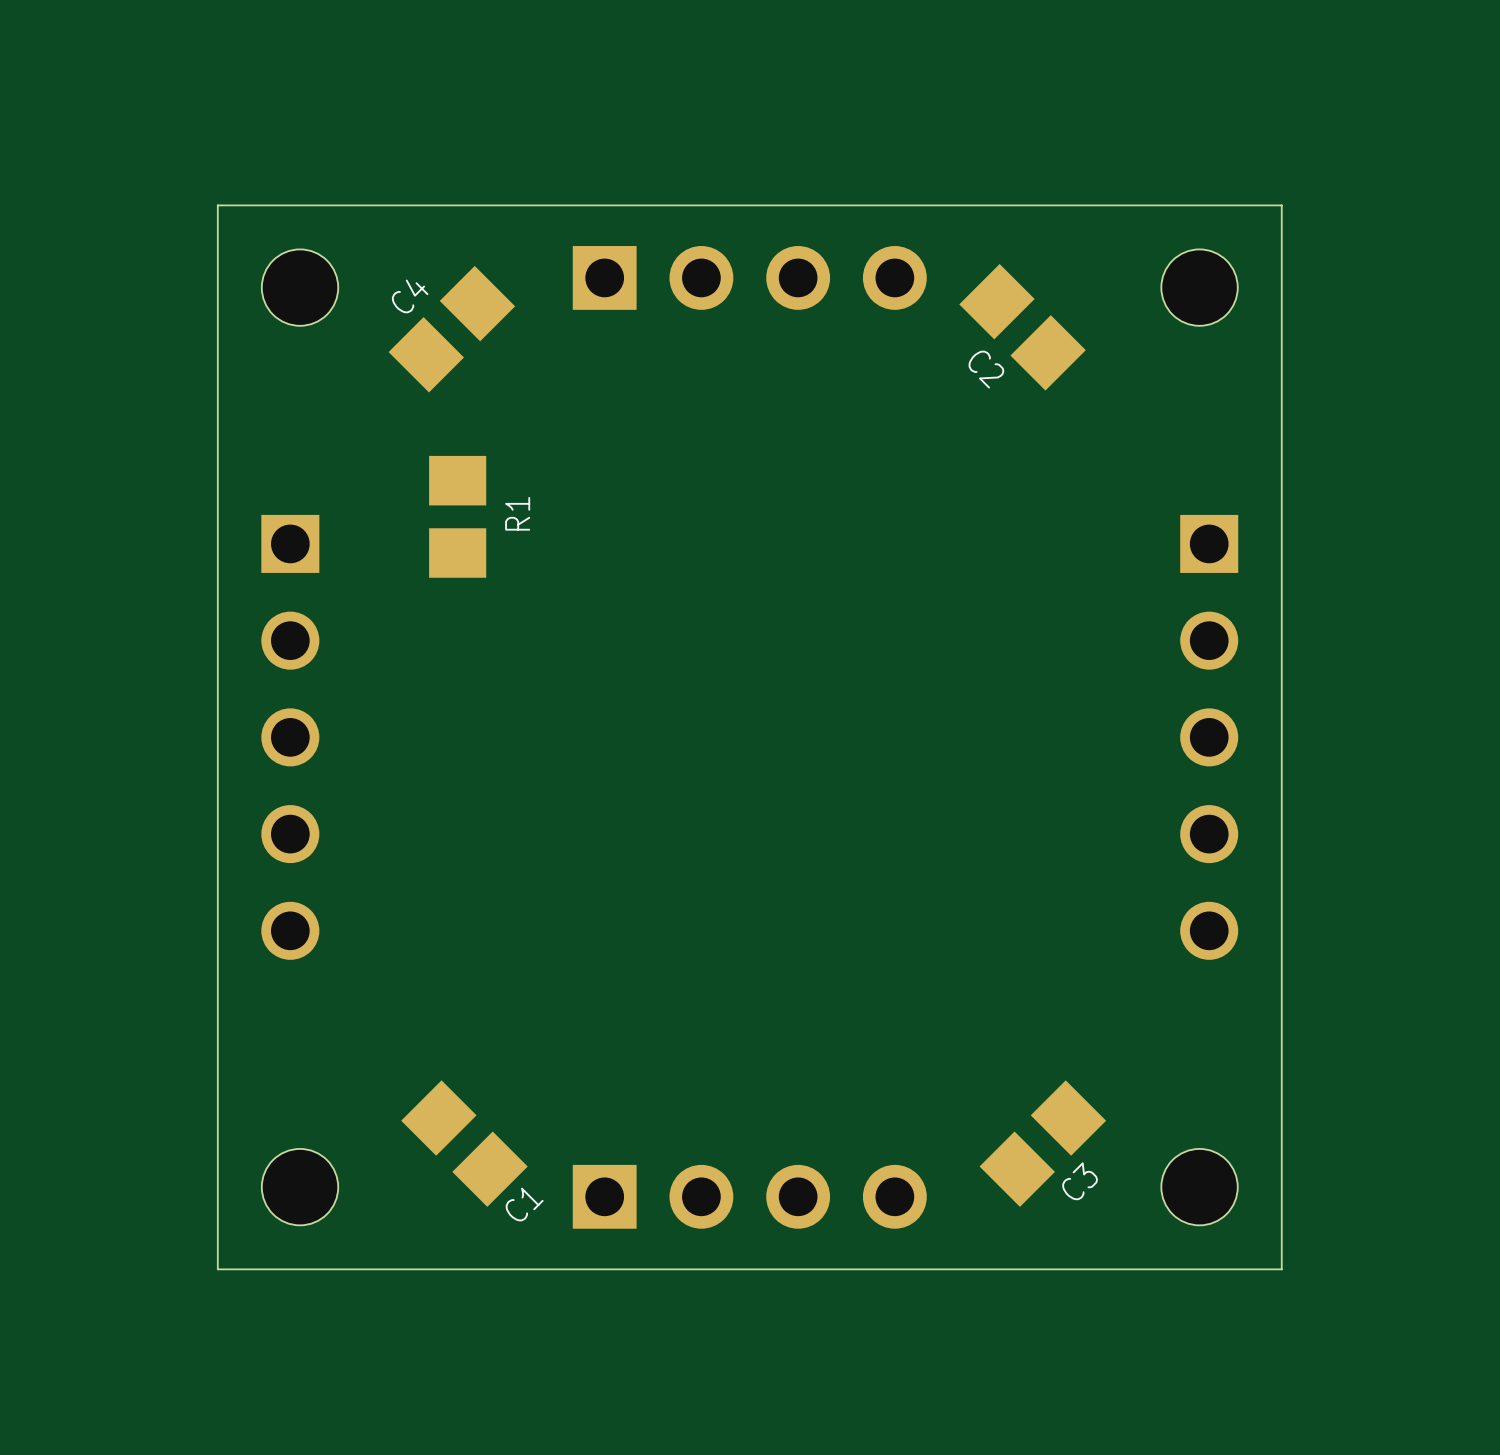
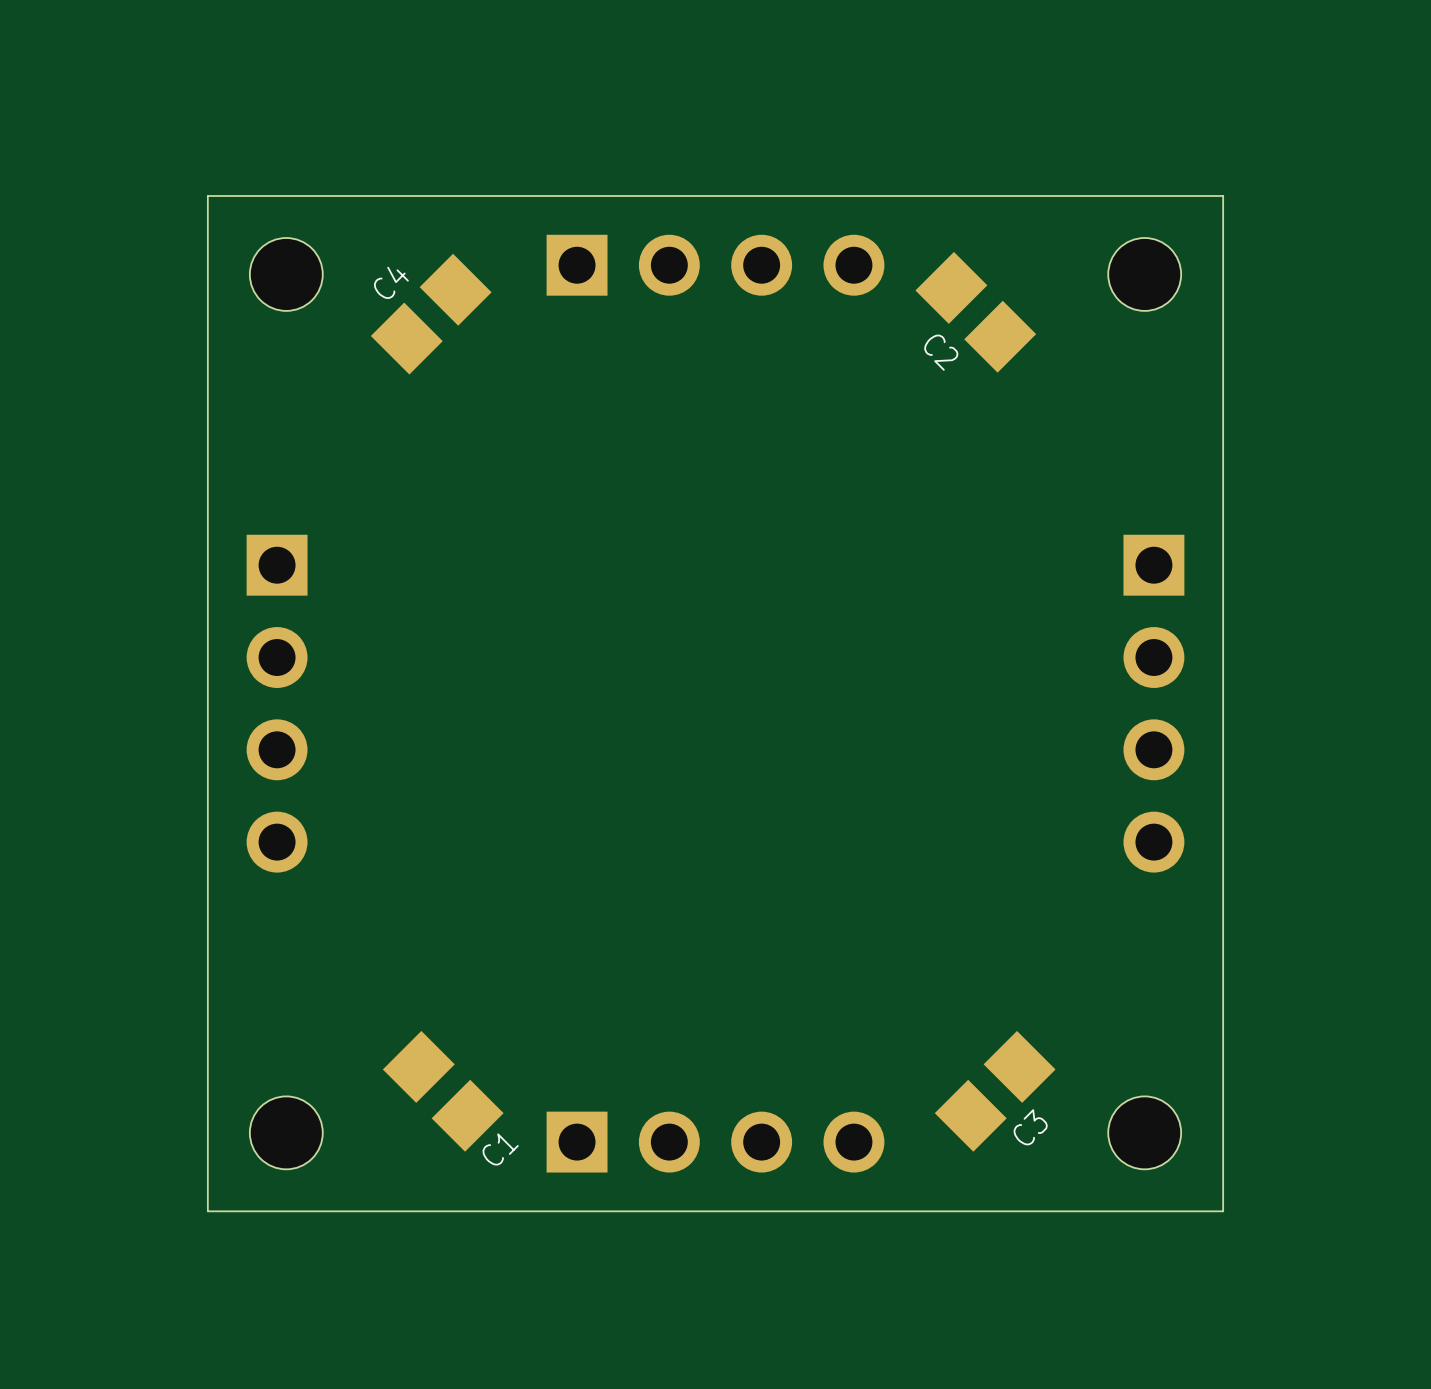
part footprint: [261, 514, 320, 960] -> [246, 534, 308, 873]
part footprint: [1180, 514, 1239, 960] -> [1123, 534, 1185, 873]
R1: (457, 516) -> none

